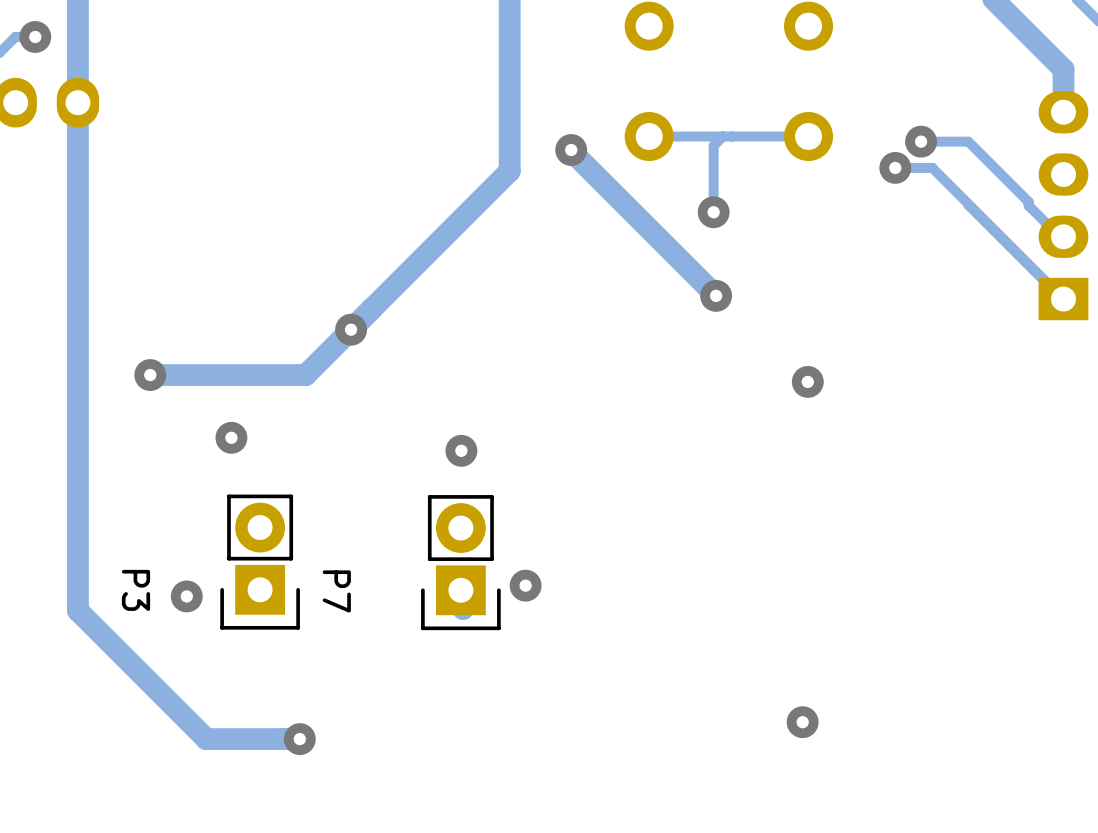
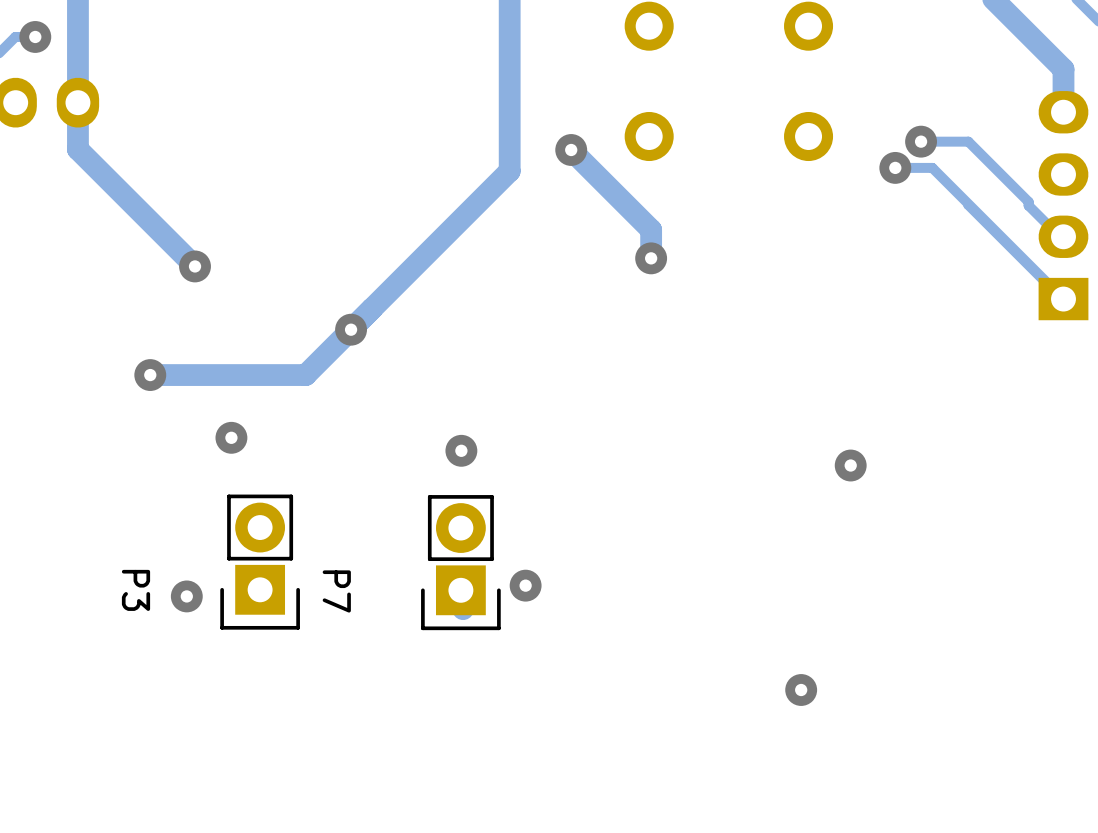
track: (722, 136) (713, 145) (713, 212) -> none
track: (808, 136) (649, 136) -> none
track: (77, 149) (77, 610) (206, 739) (299, 739) -> (77, 149) (195, 266)
track: (571, 149) (716, 295) -> (571, 149) (651, 229) (651, 258)
via: (713, 212) -> none
via: none -> (651, 258)
via: none -> (195, 266)
via: (716, 295) -> none
via position: (807, 381) -> (850, 465)
via position: (802, 722) -> (801, 690)
via: (299, 739) -> none

